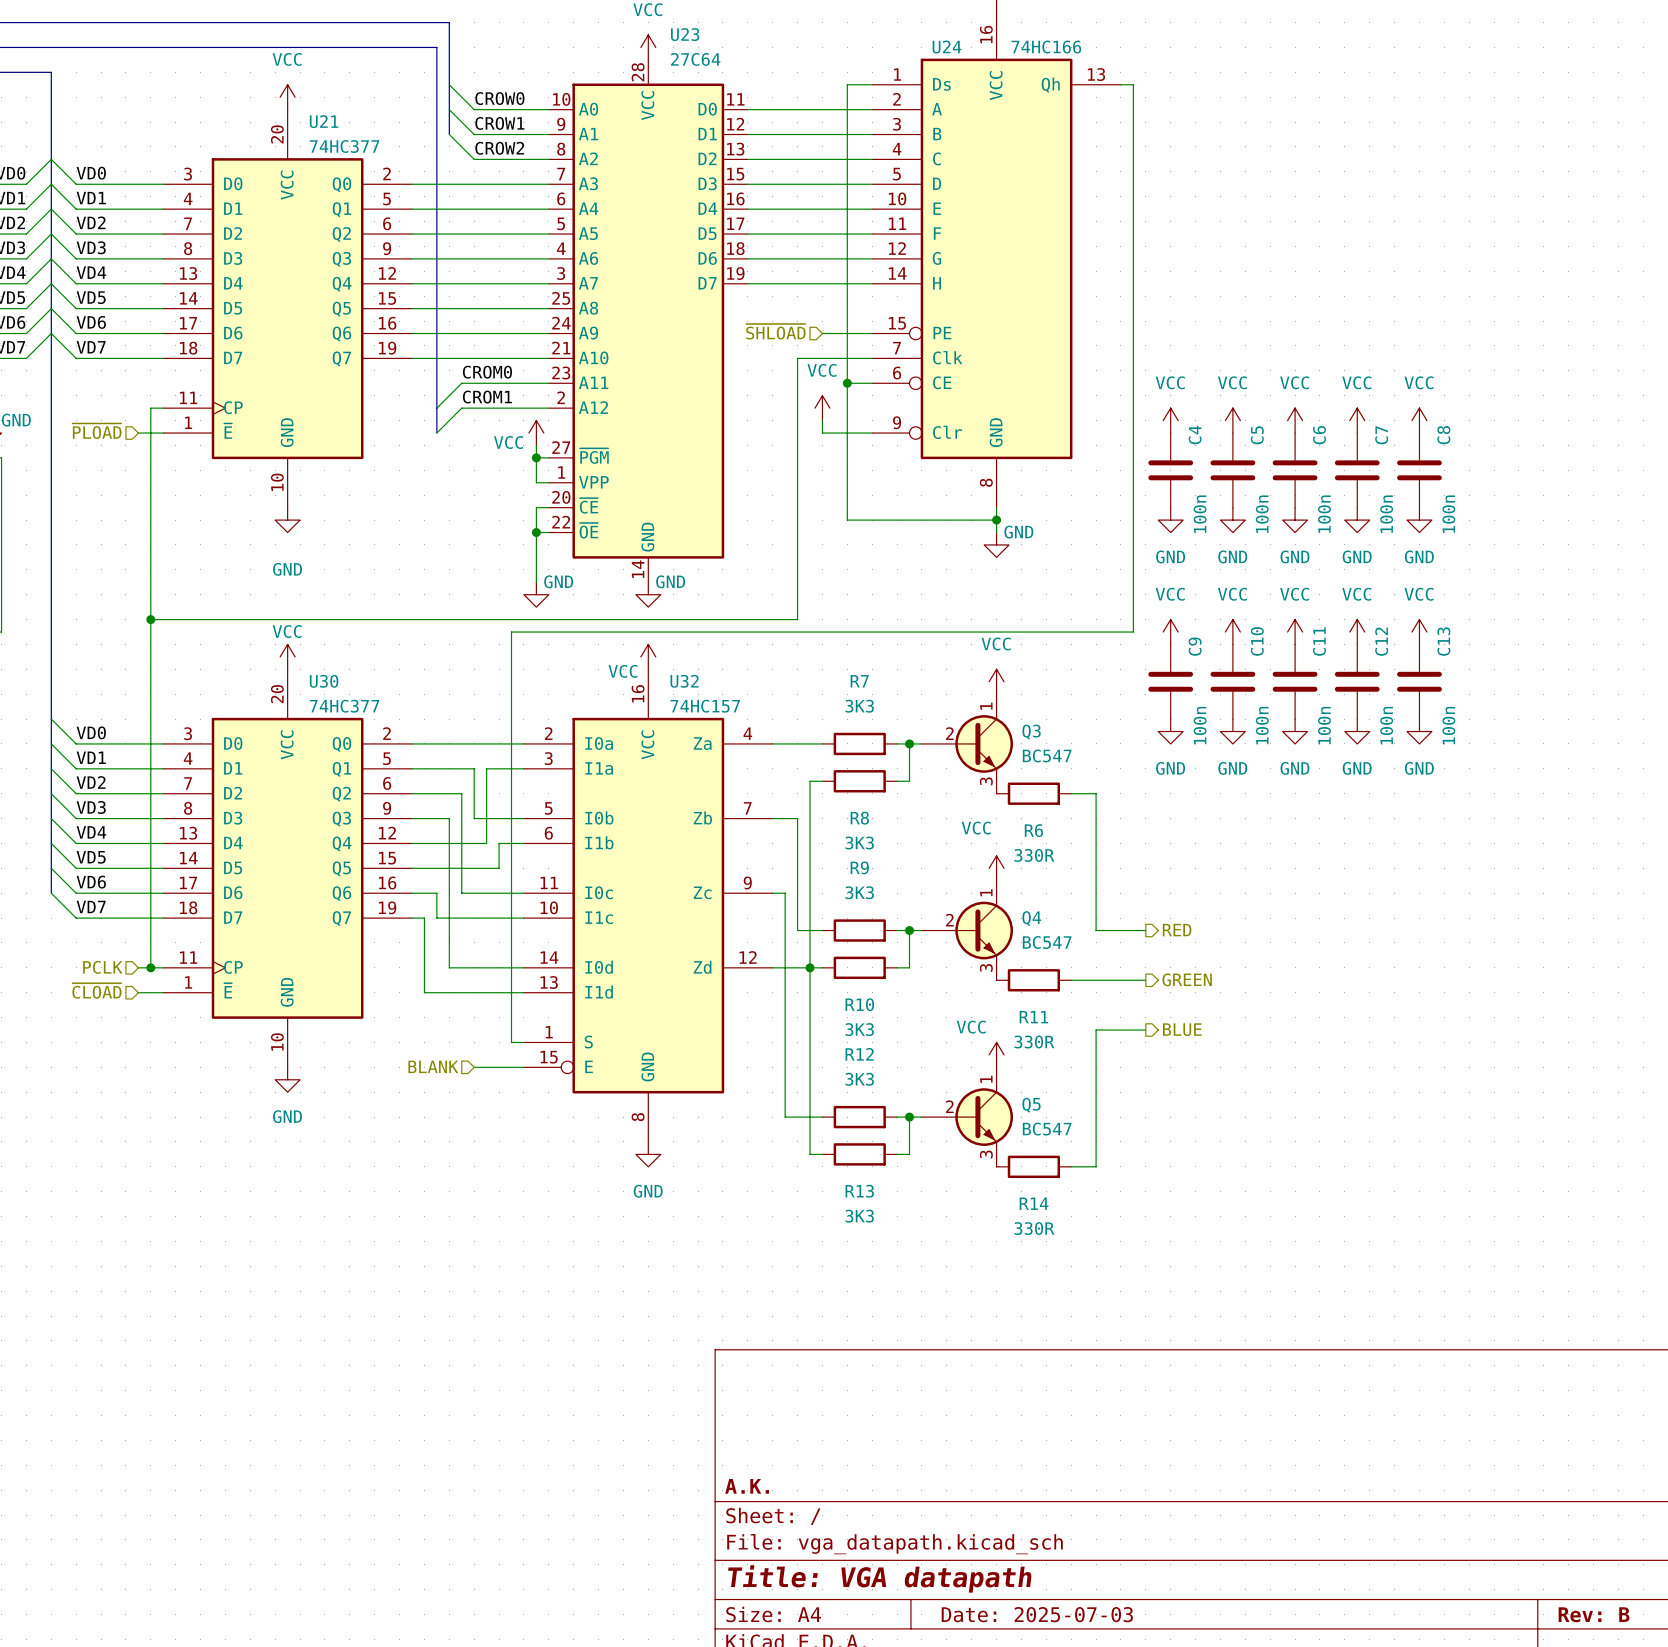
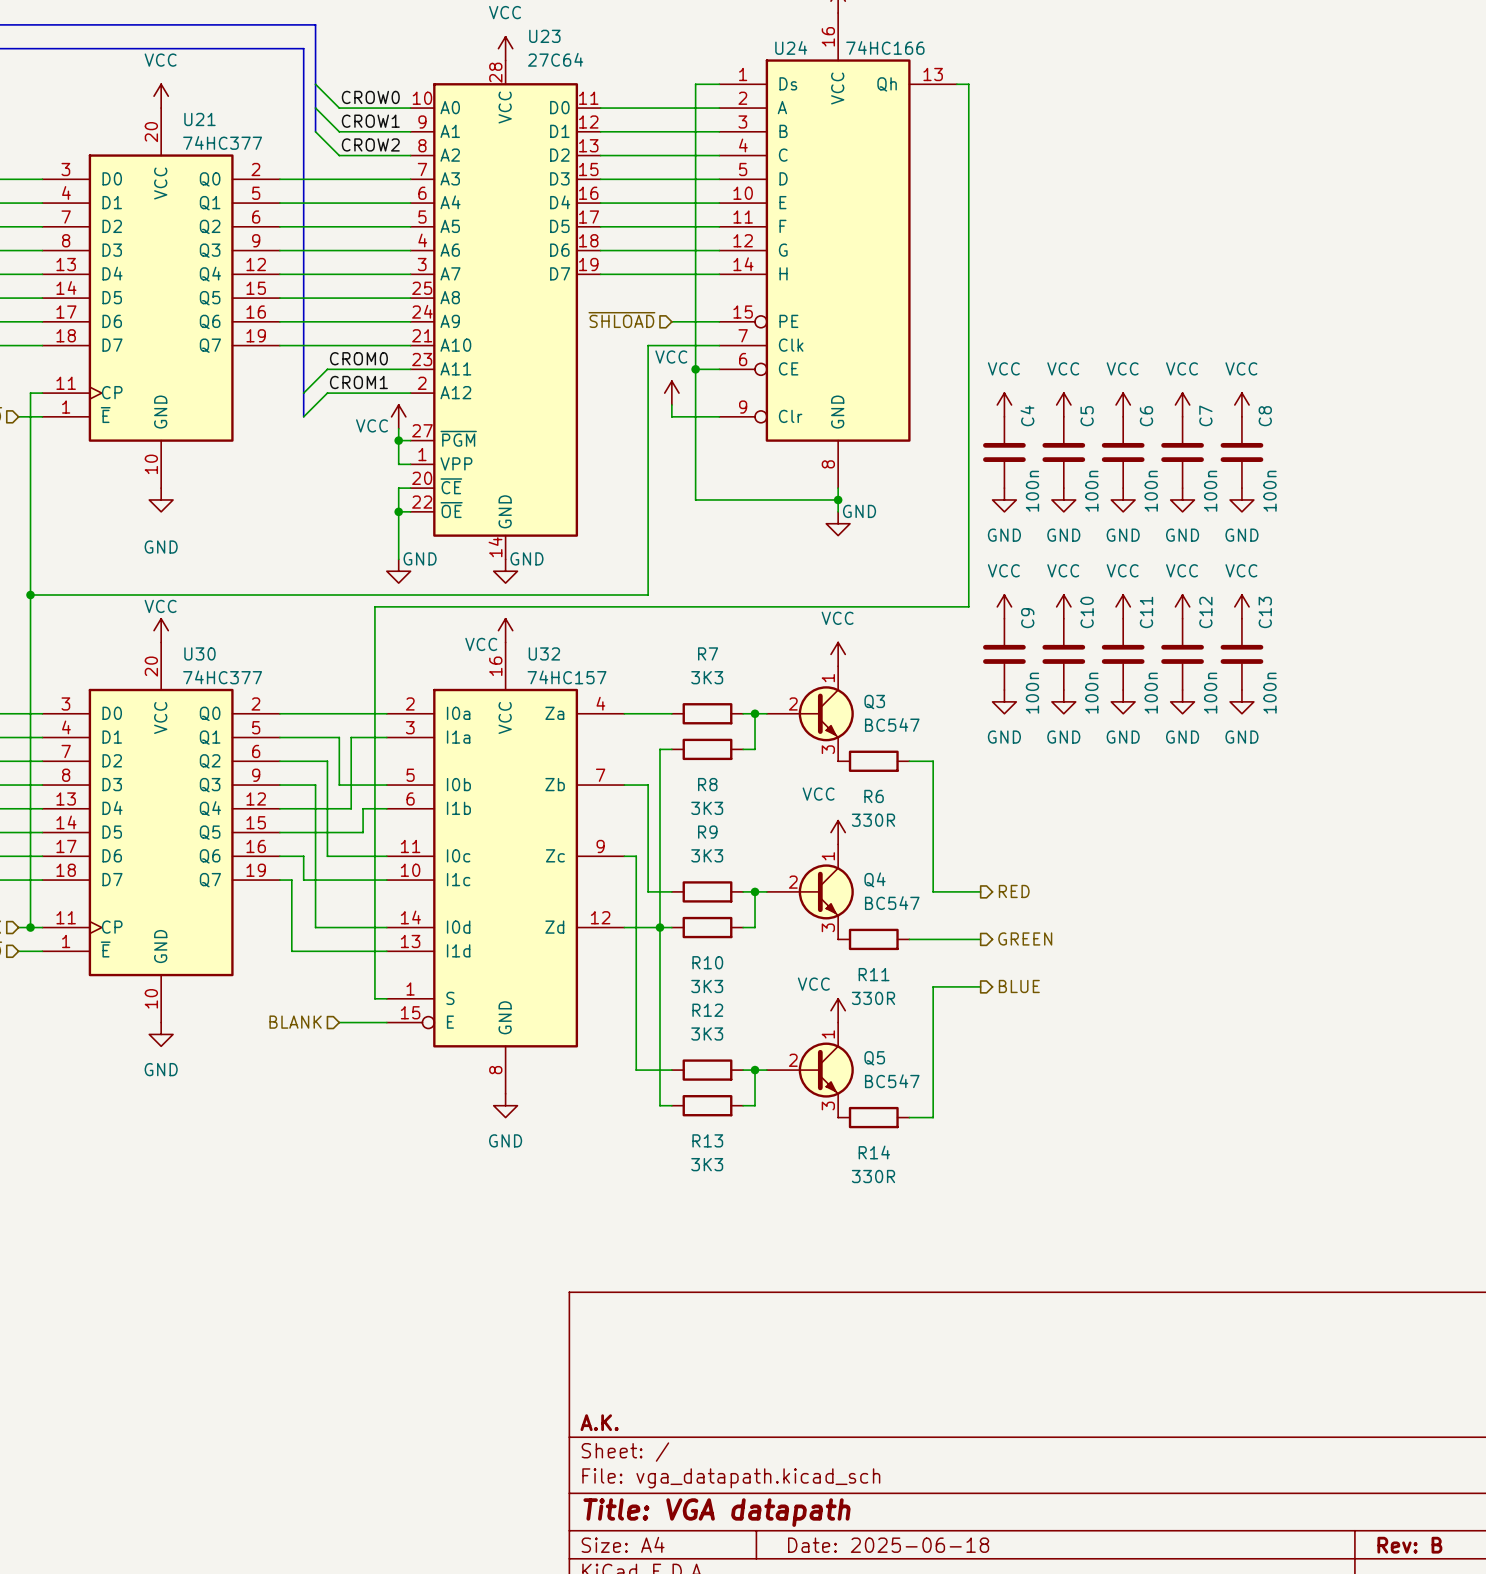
title block: Date: 2025-07-03 (1037, 1614) -> Date: 2025-06-18 (888, 1545)

